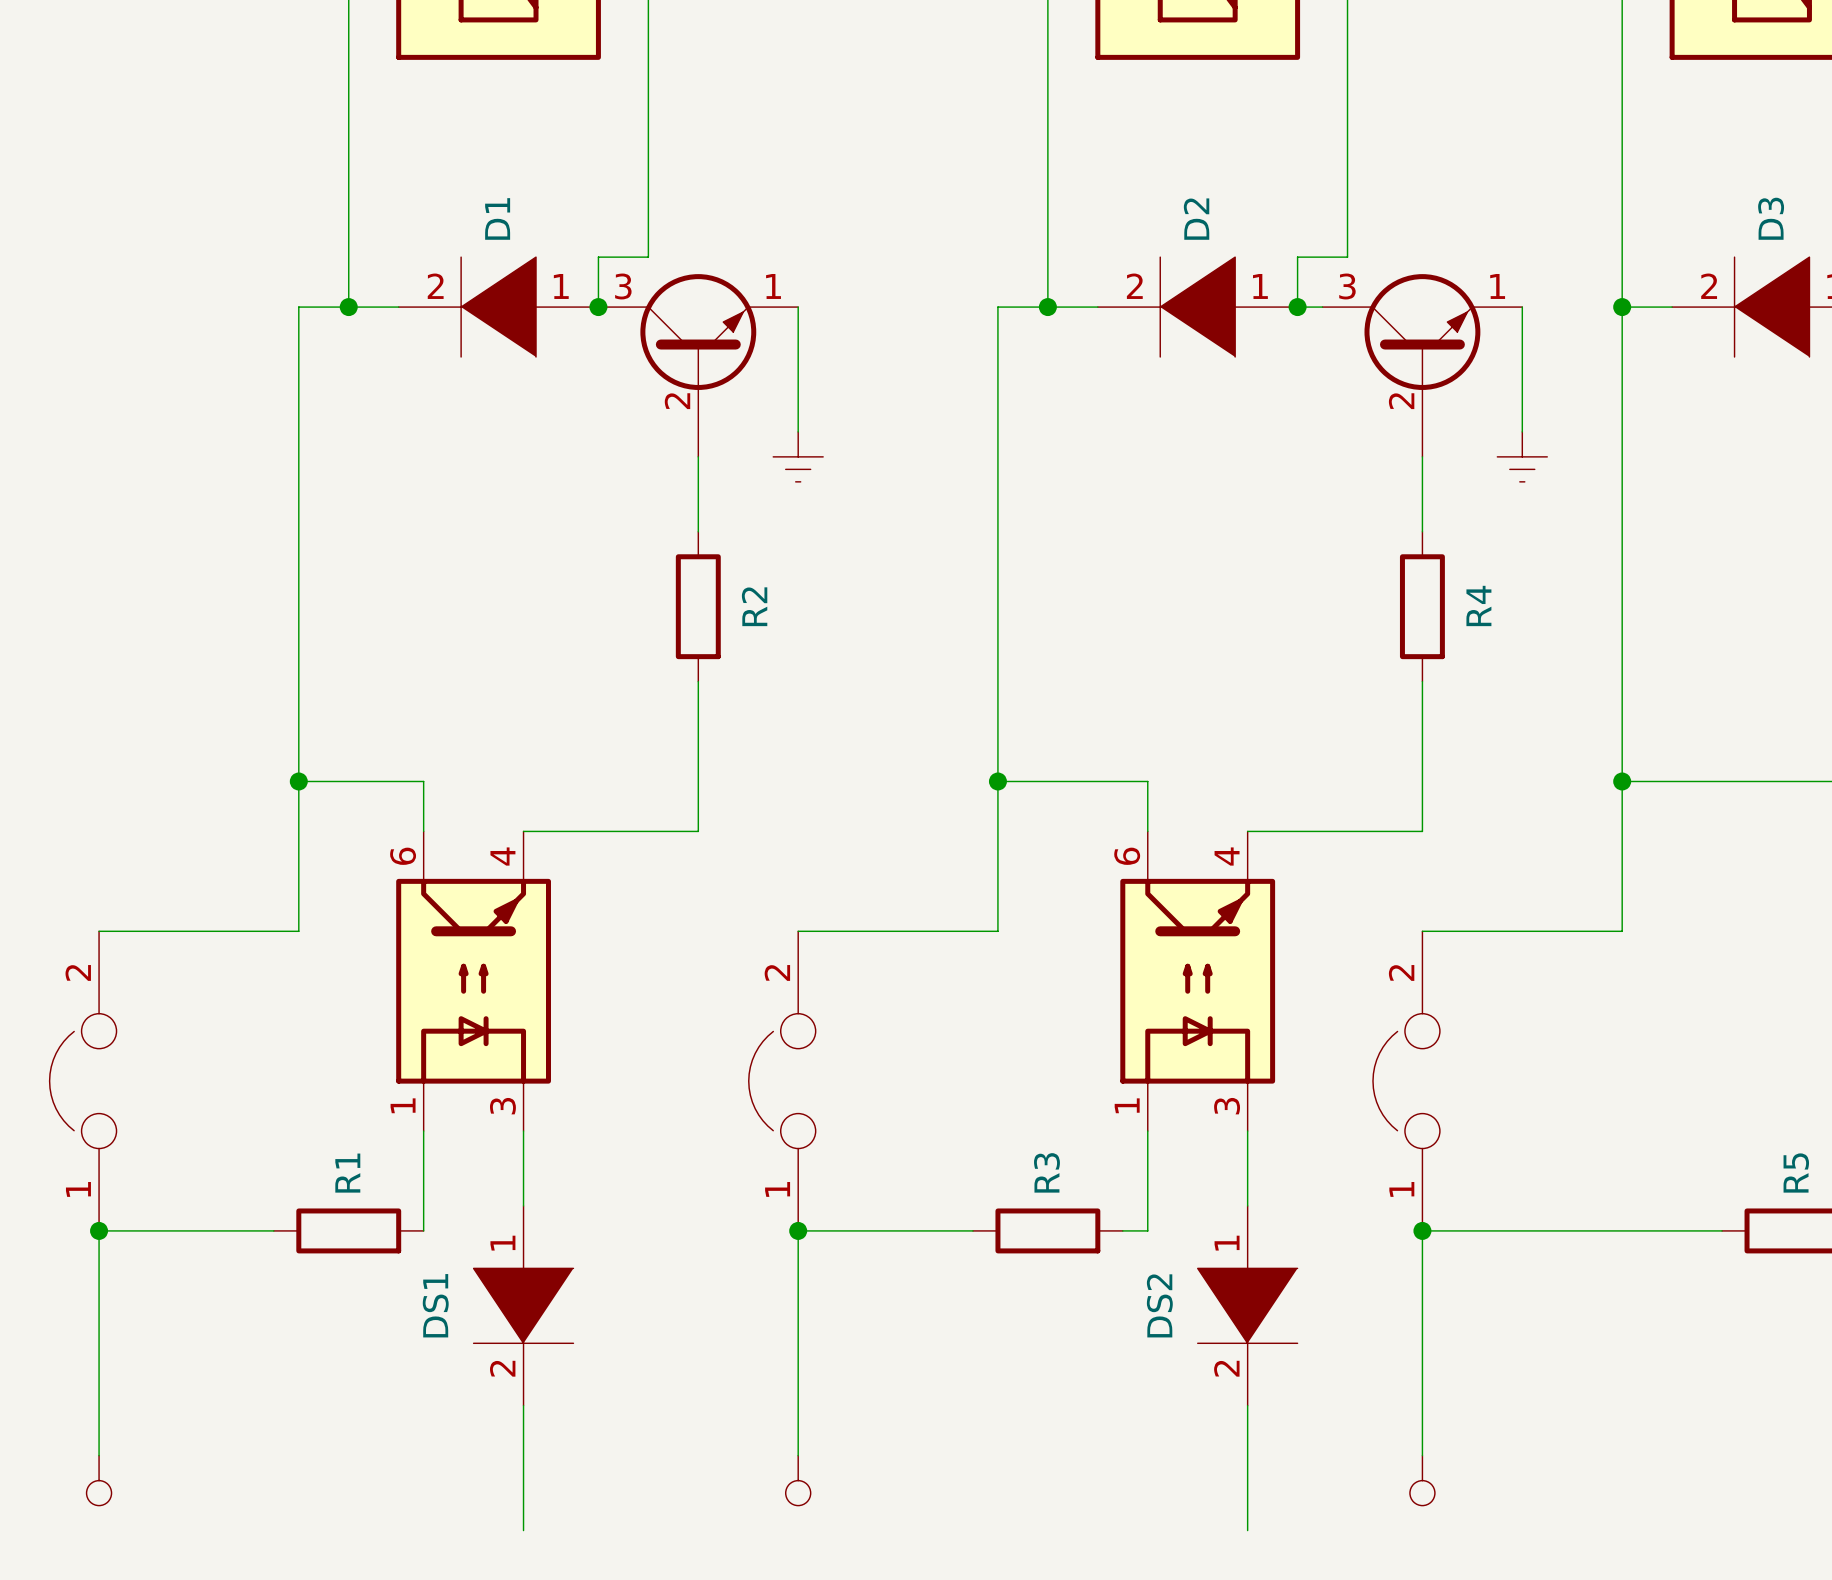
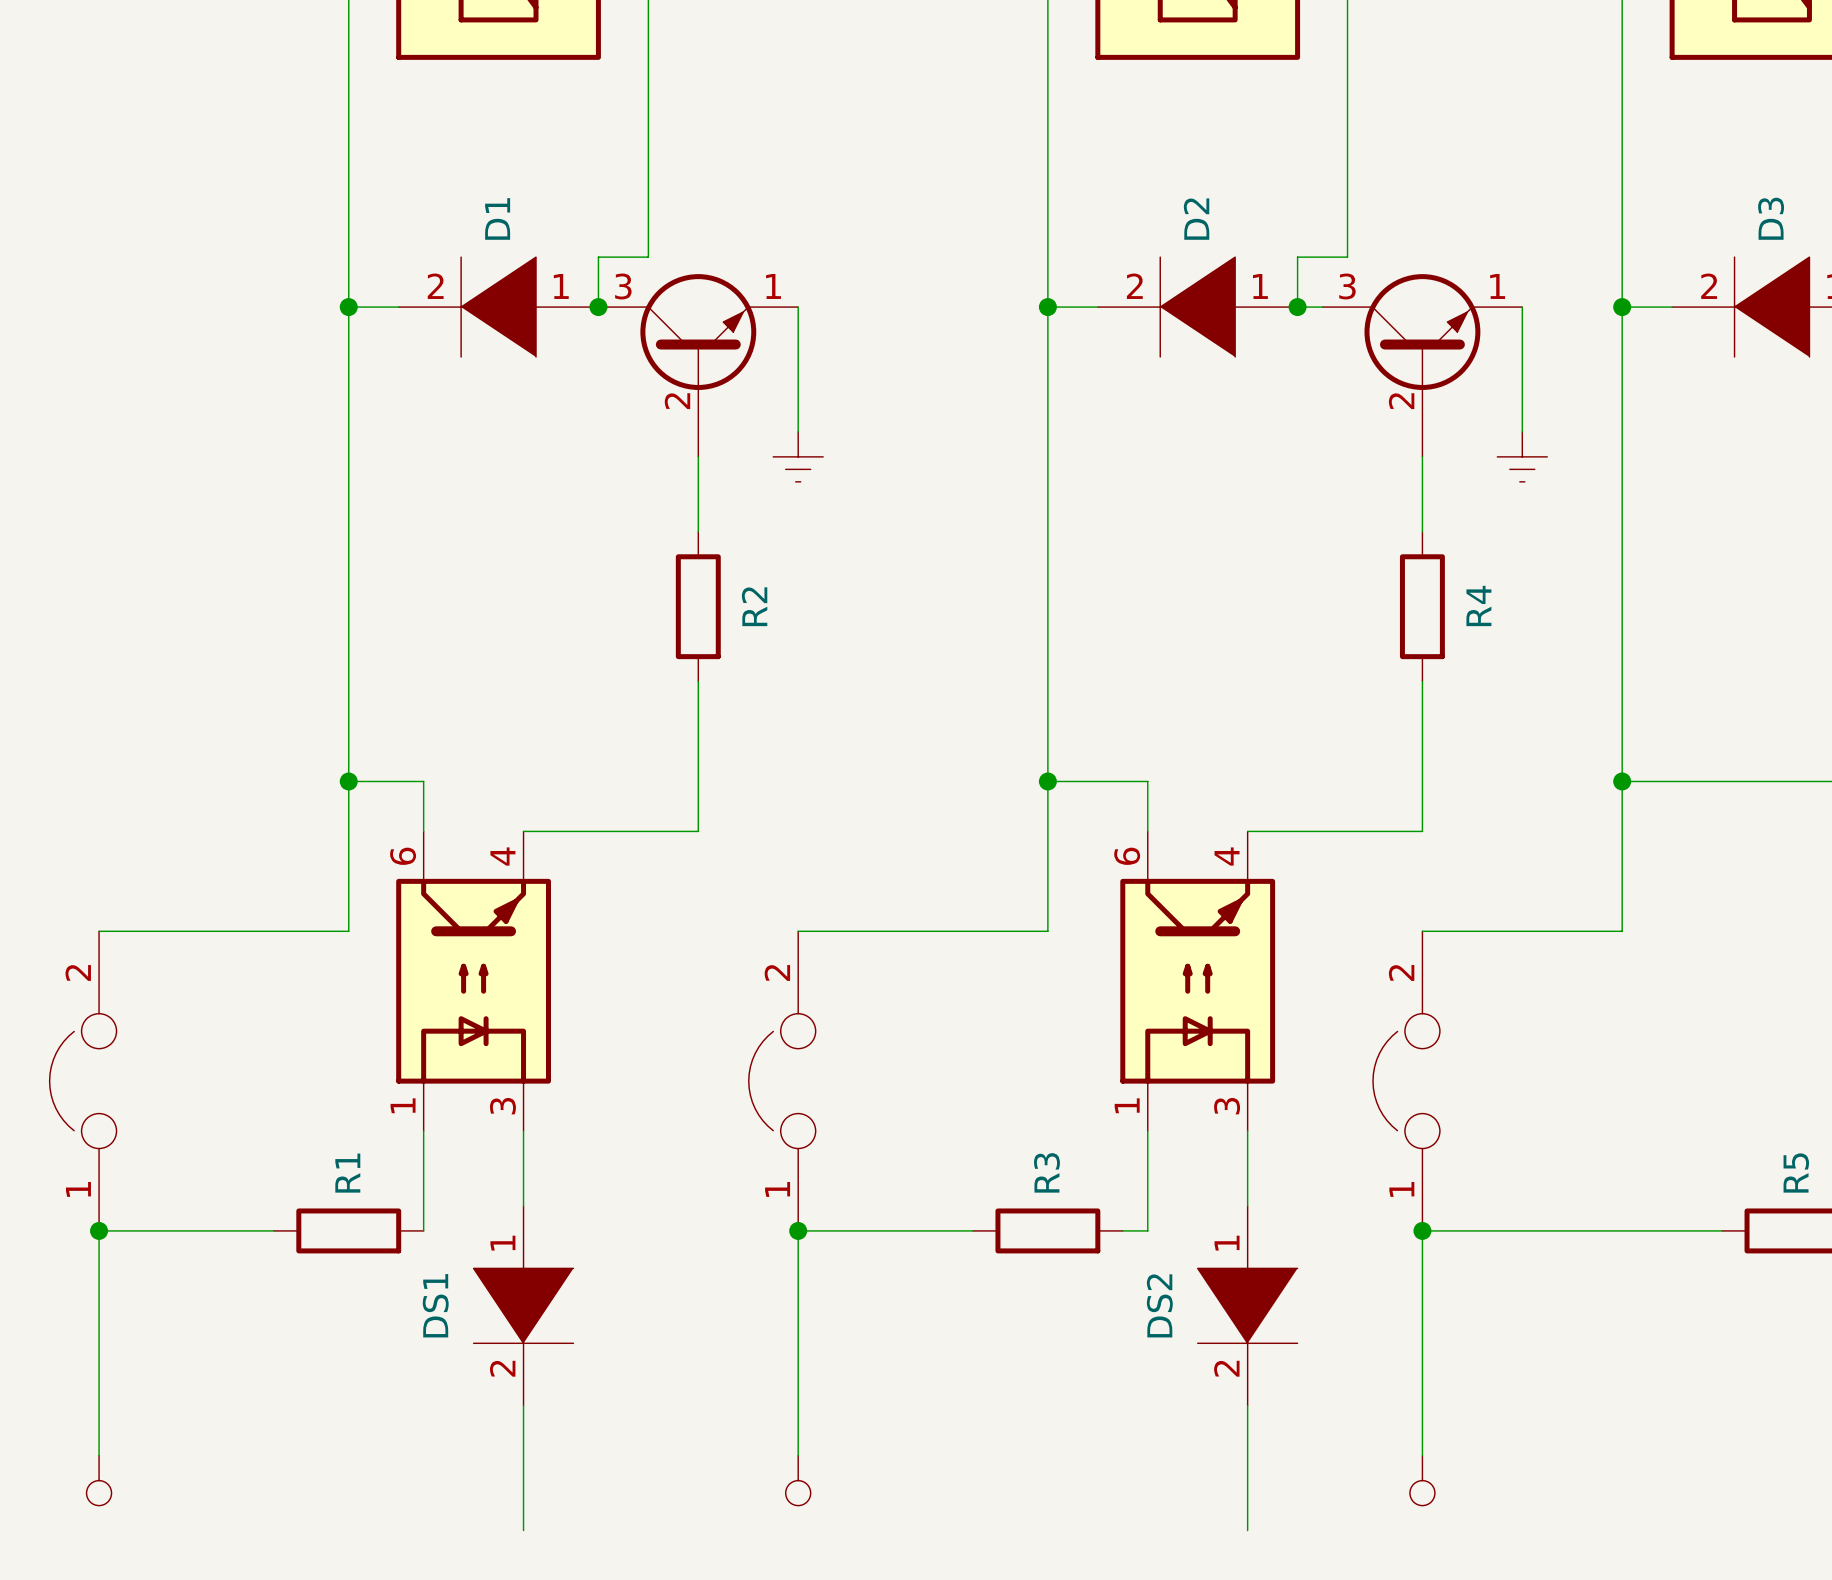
wire: (348, 307) (298, 307) (298, 931) -> (348, 307) (348, 931) (298, 931)
wire: (1047, 307) (997, 307) (997, 931) -> (1047, 307) (1047, 931) (997, 931)
wire: (298, 781) (348, 781) -> none
junction position: (298, 781) -> (348, 781)
wire: (997, 781) (1047, 781) -> none
junction position: (997, 781) -> (1047, 781)

